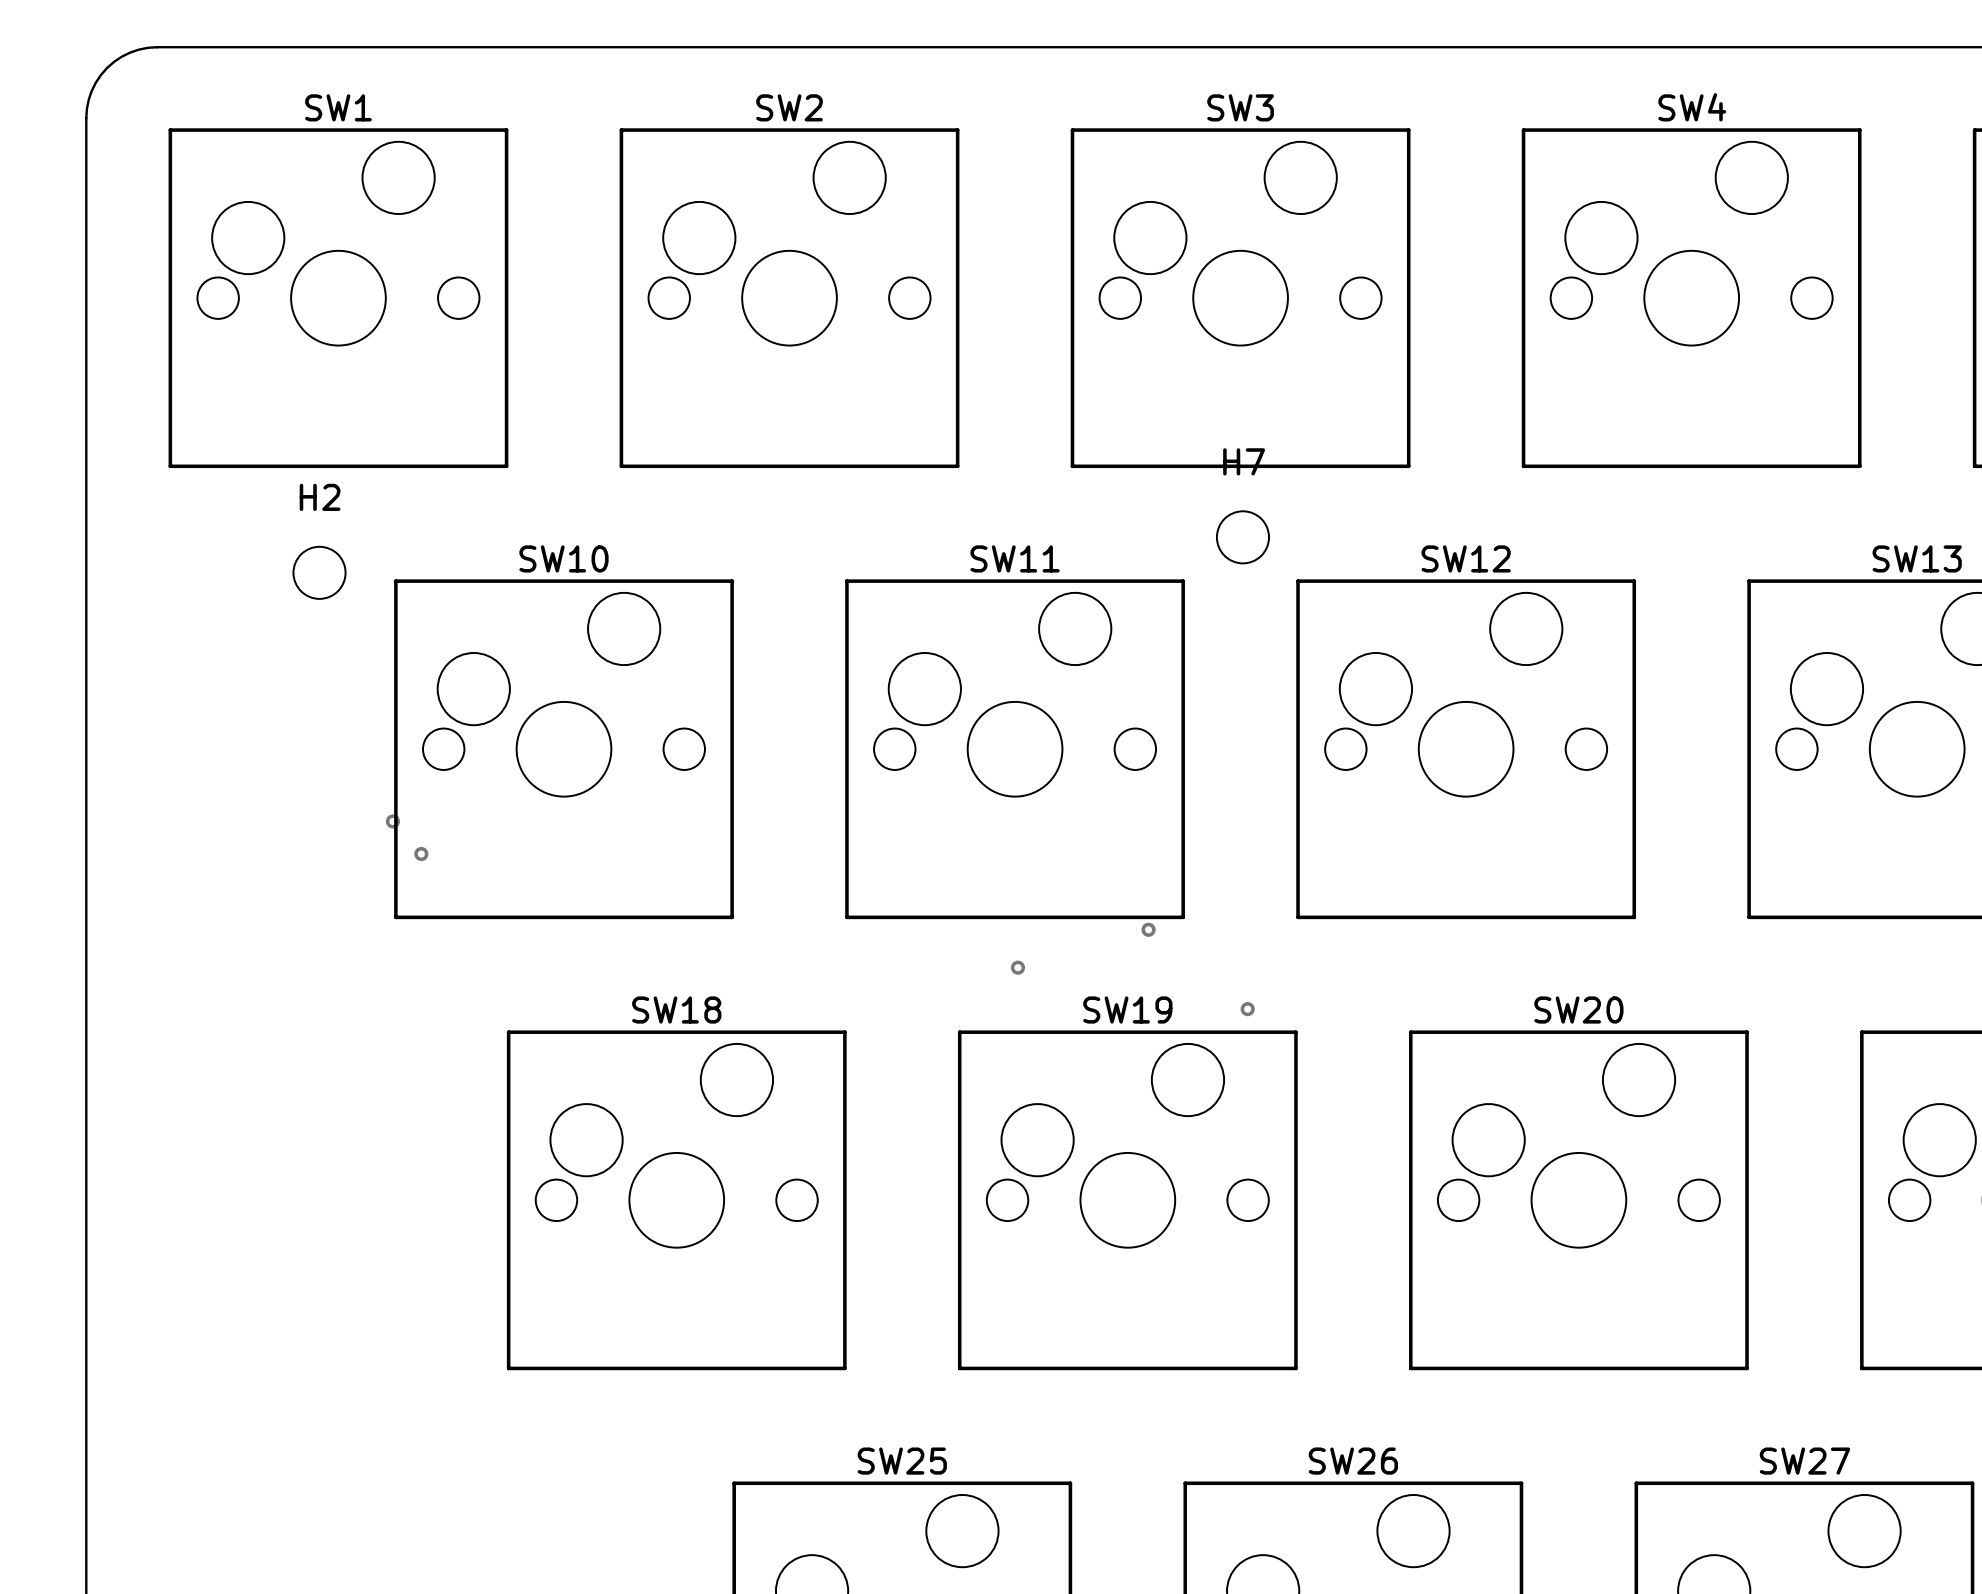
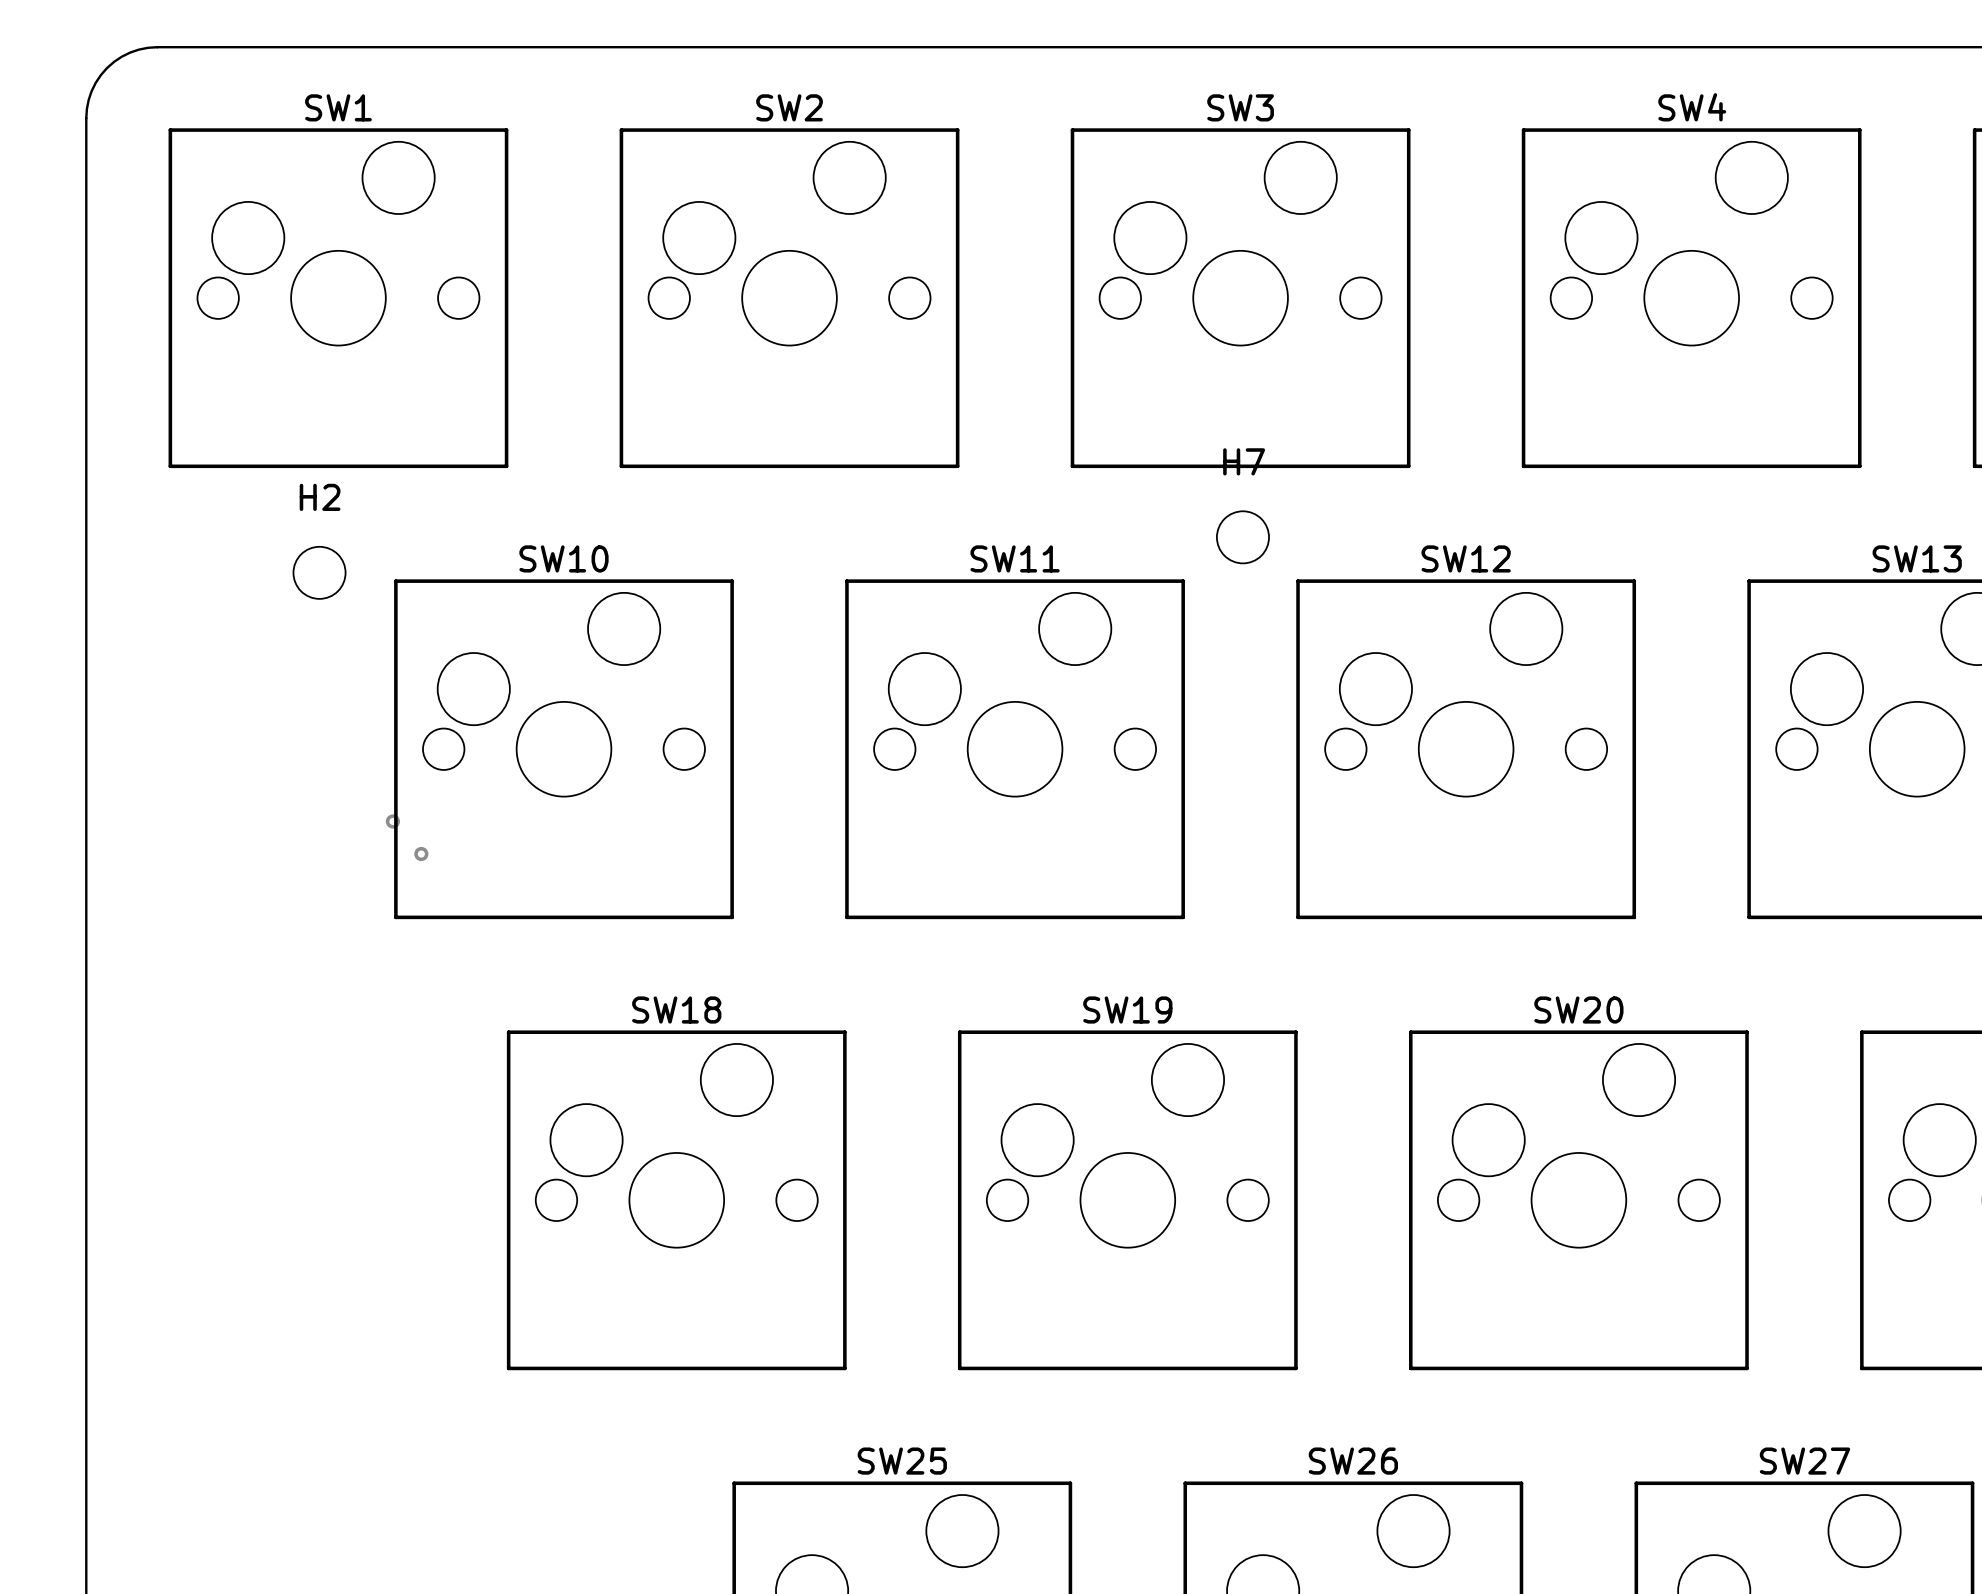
via: (1148, 929) -> none
via: (1017, 967) -> none
via: (1247, 1009) -> none

